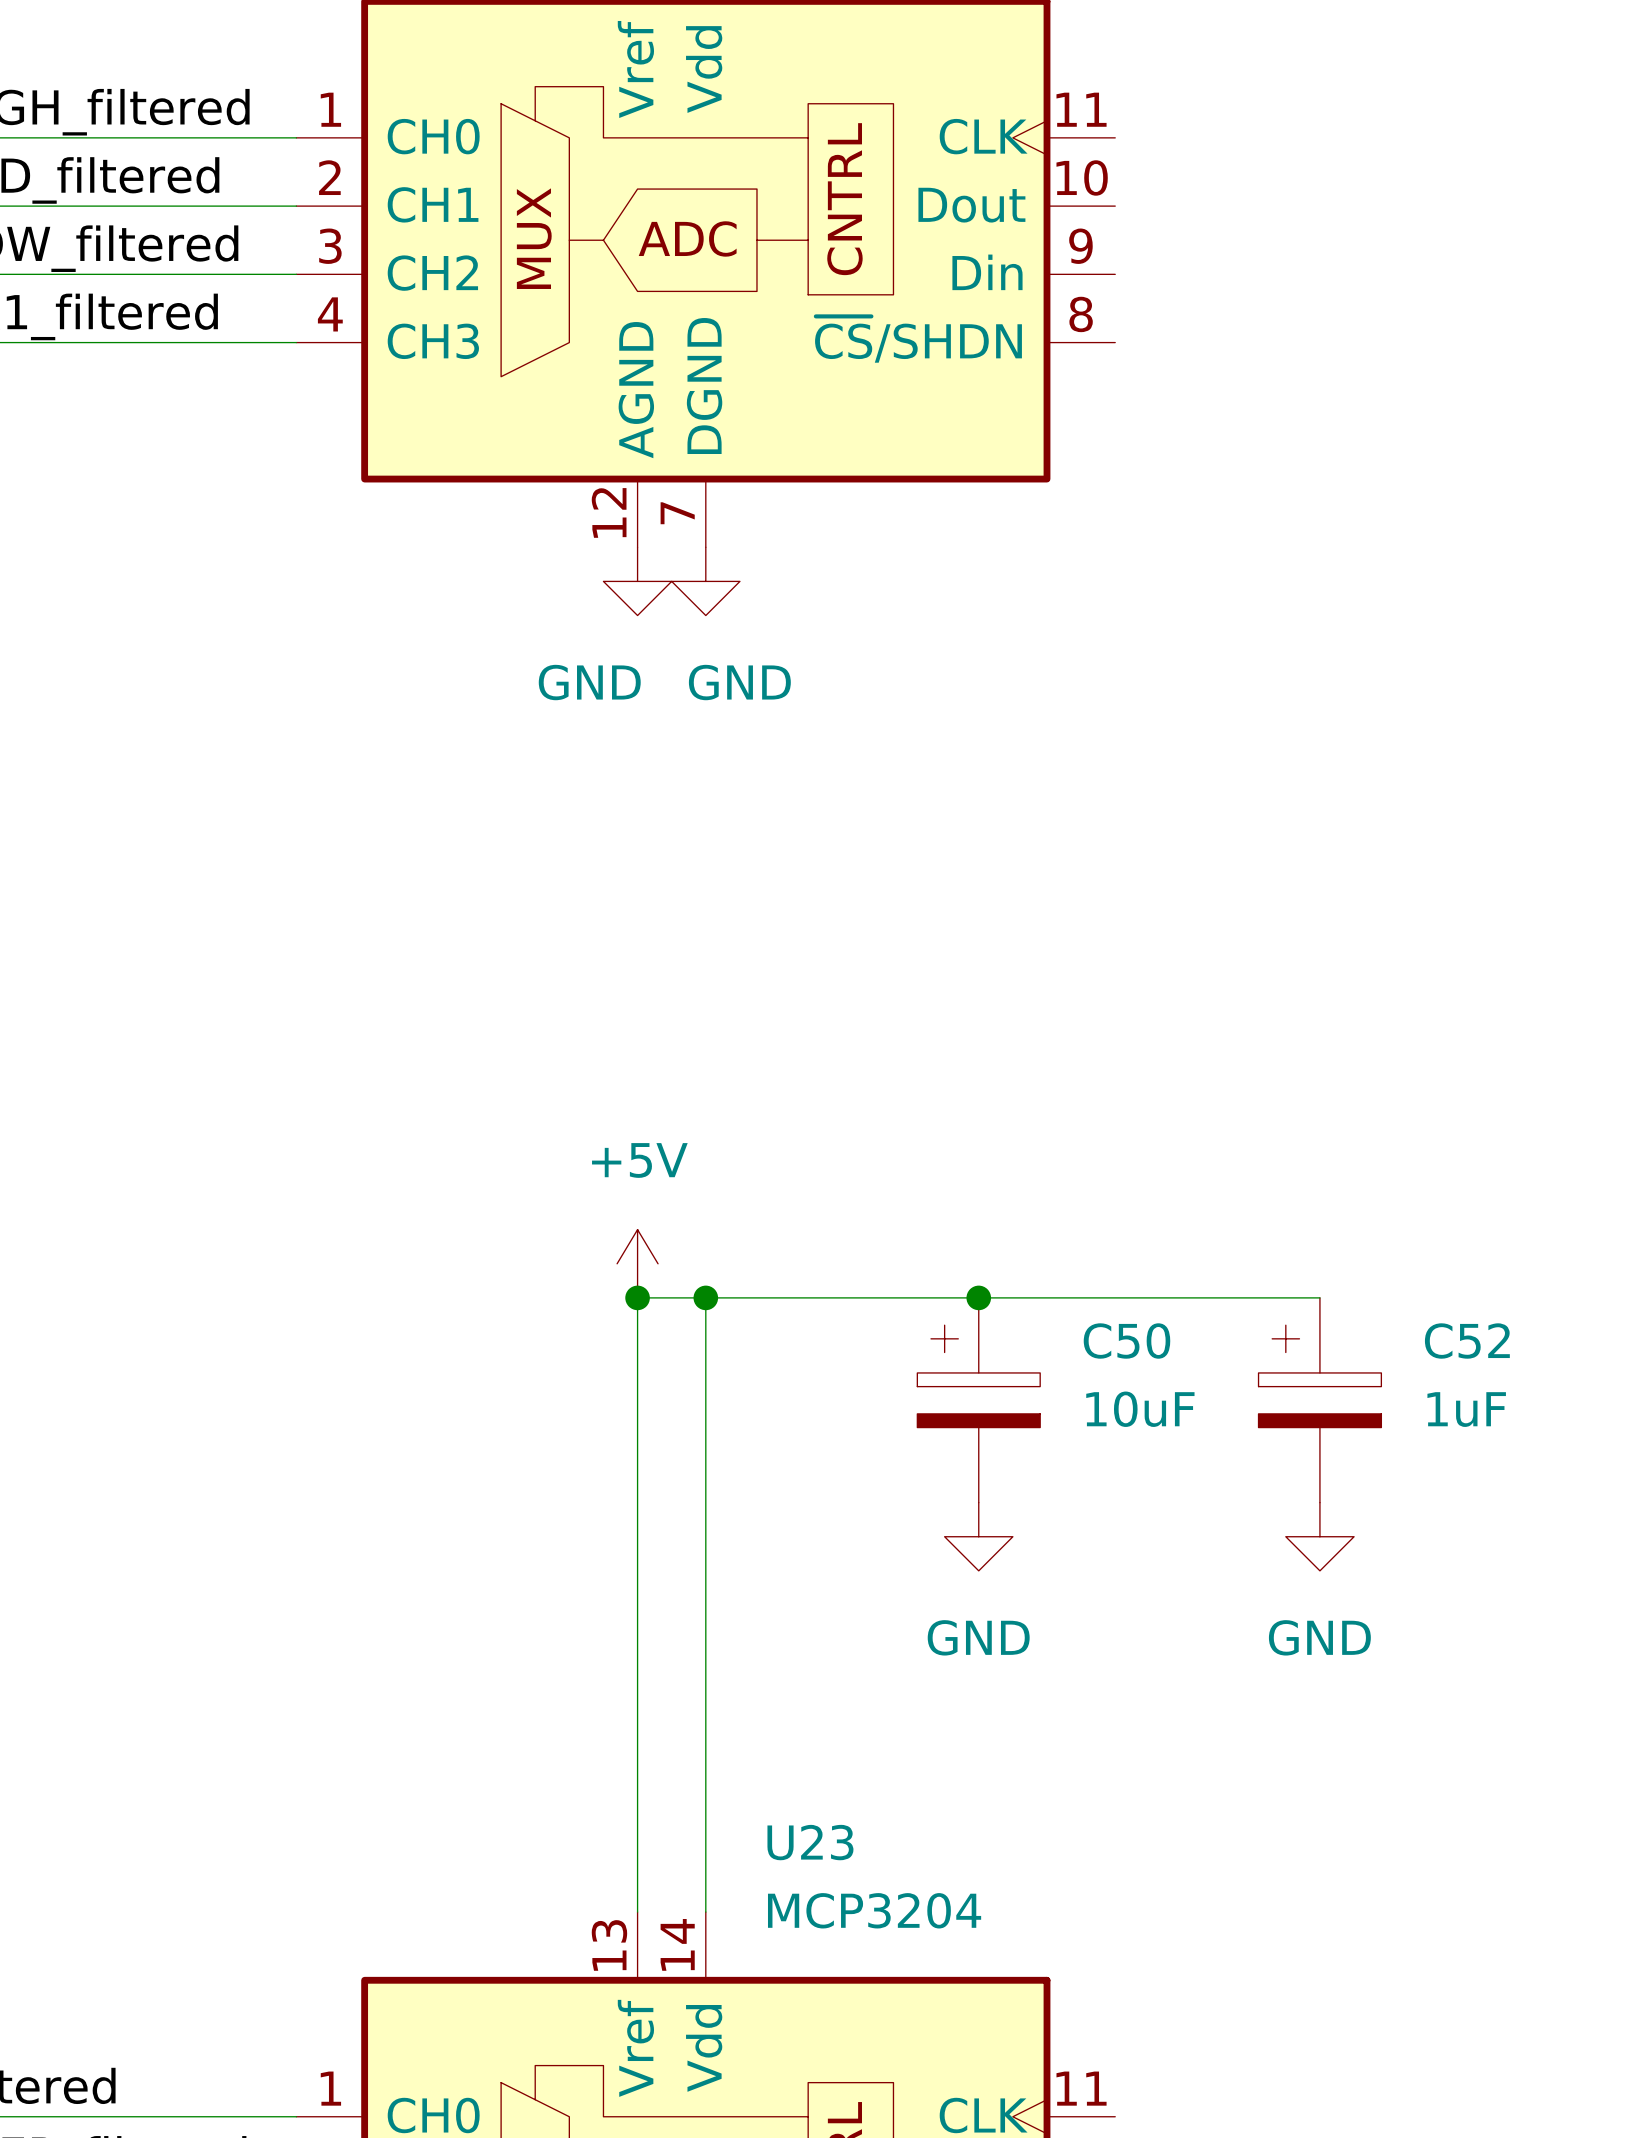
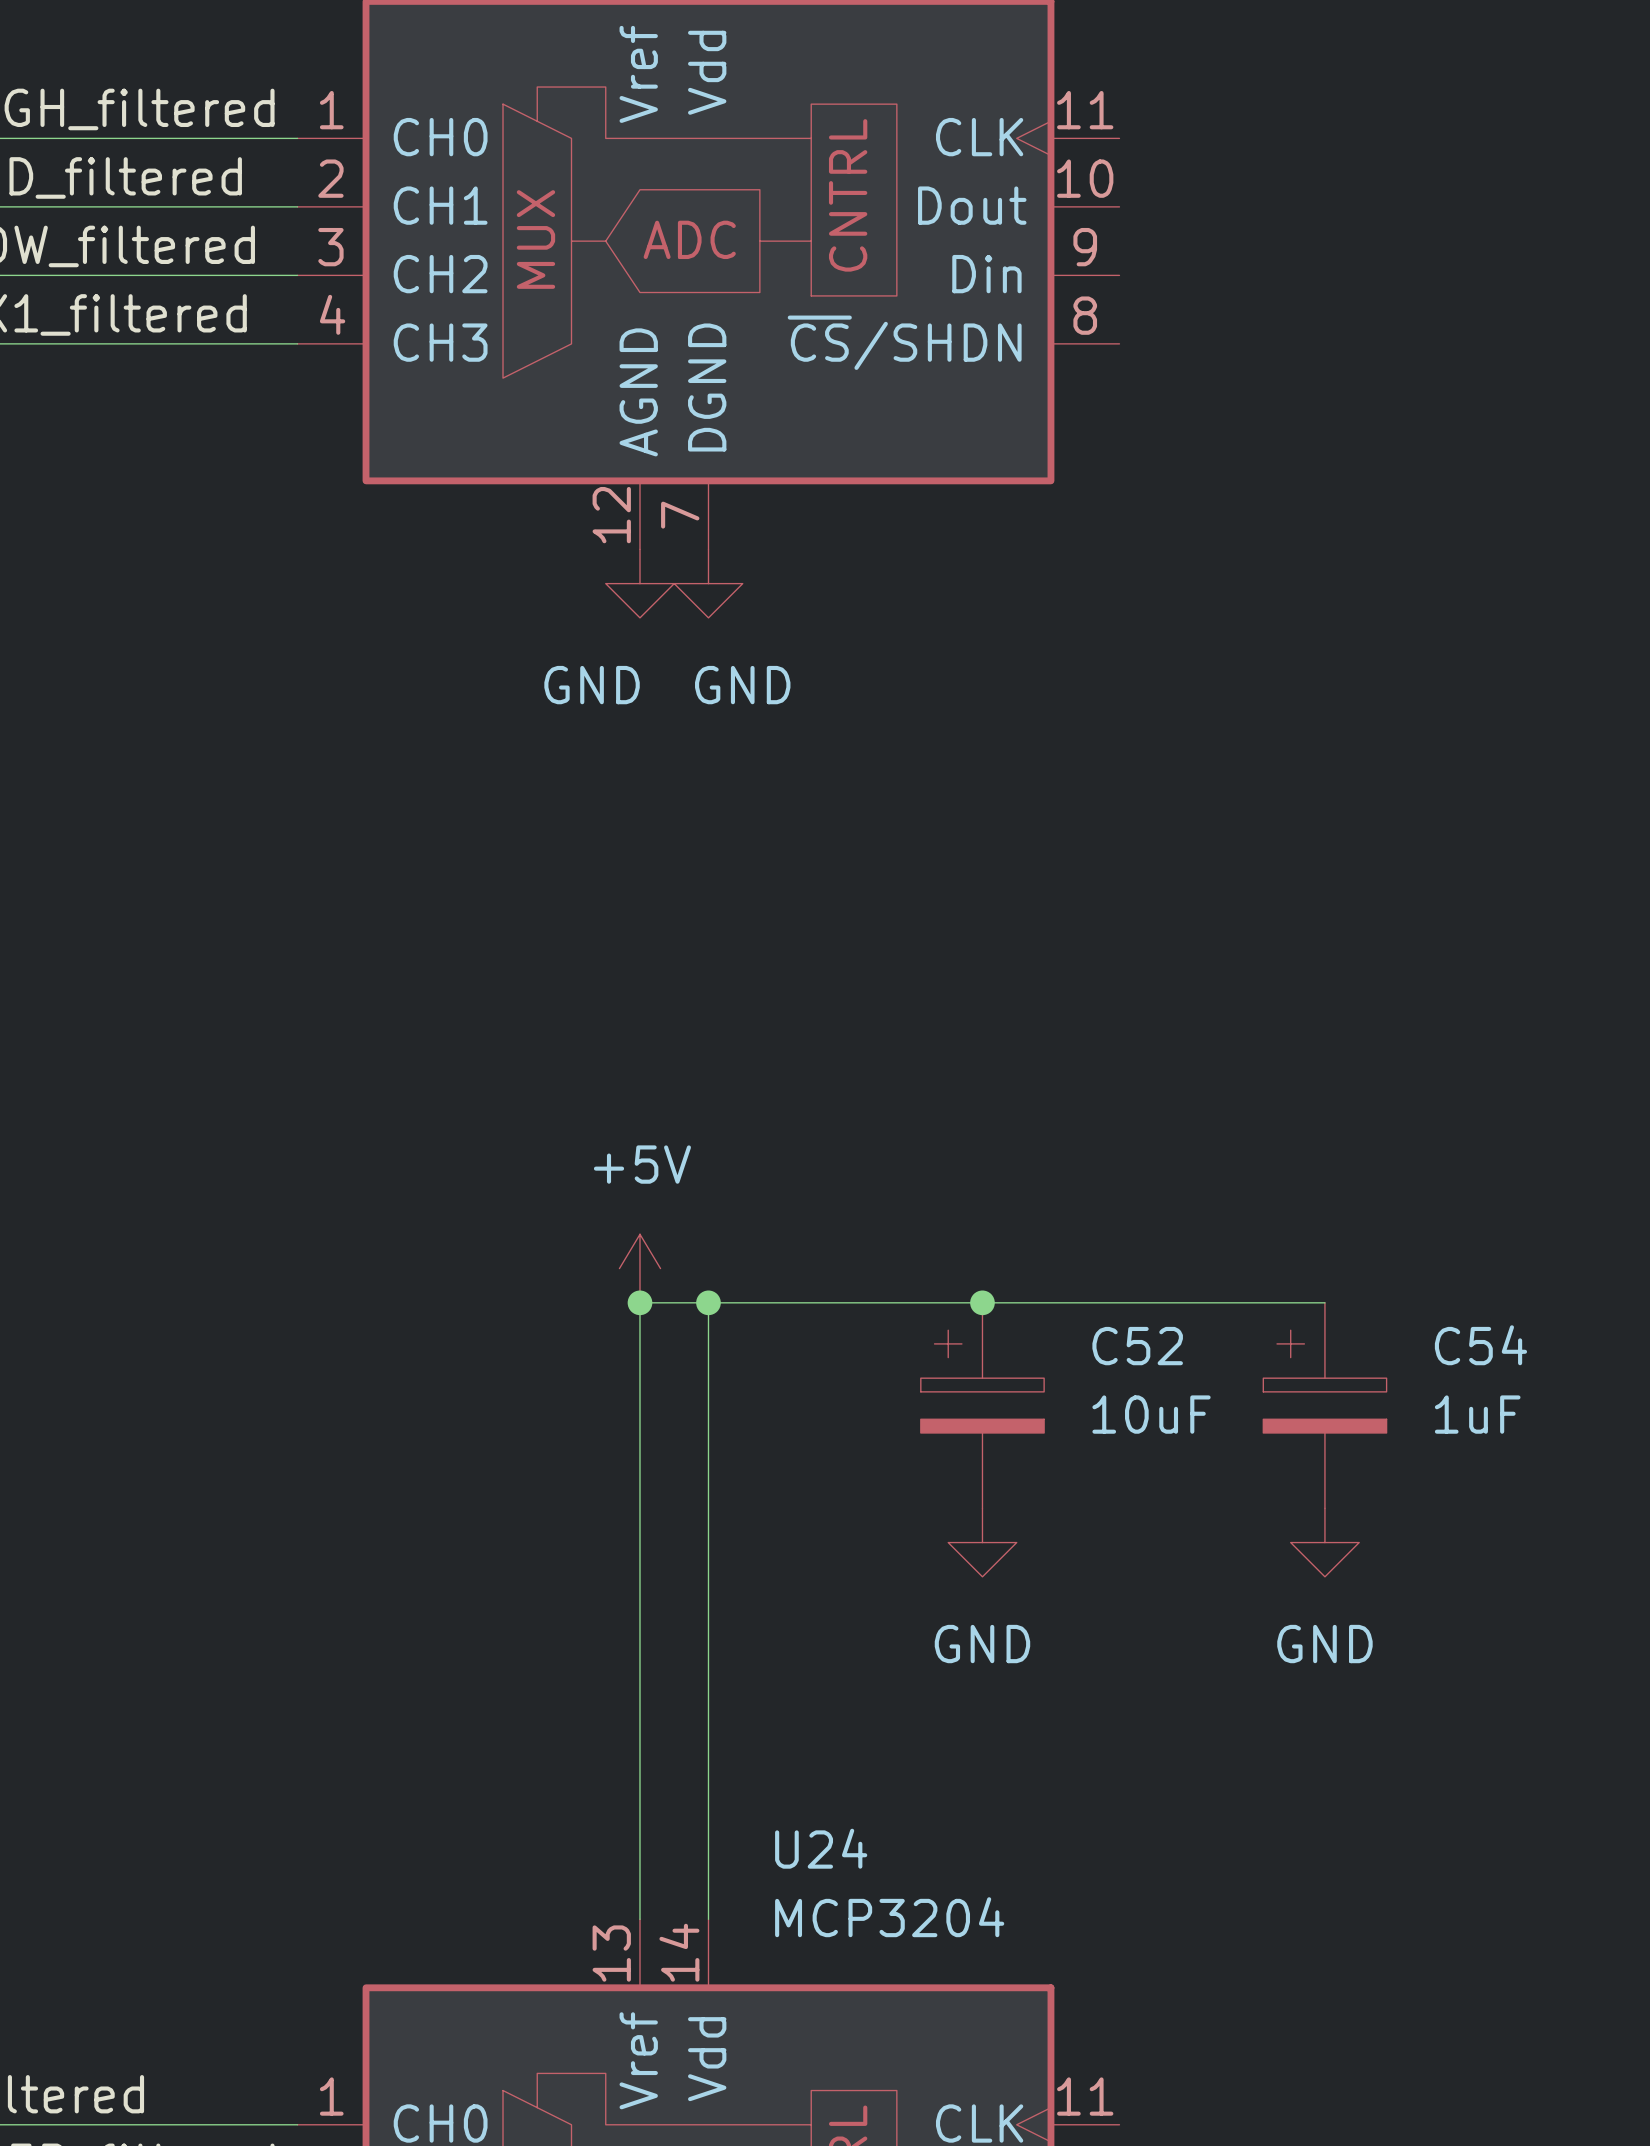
C50 name: C50 (1126, 1341) -> C52 (1137, 1346)
C52 name: C52 (1467, 1341) -> C54 (1480, 1345)
U23 name: U23 (810, 1842) -> U24 (821, 1848)

